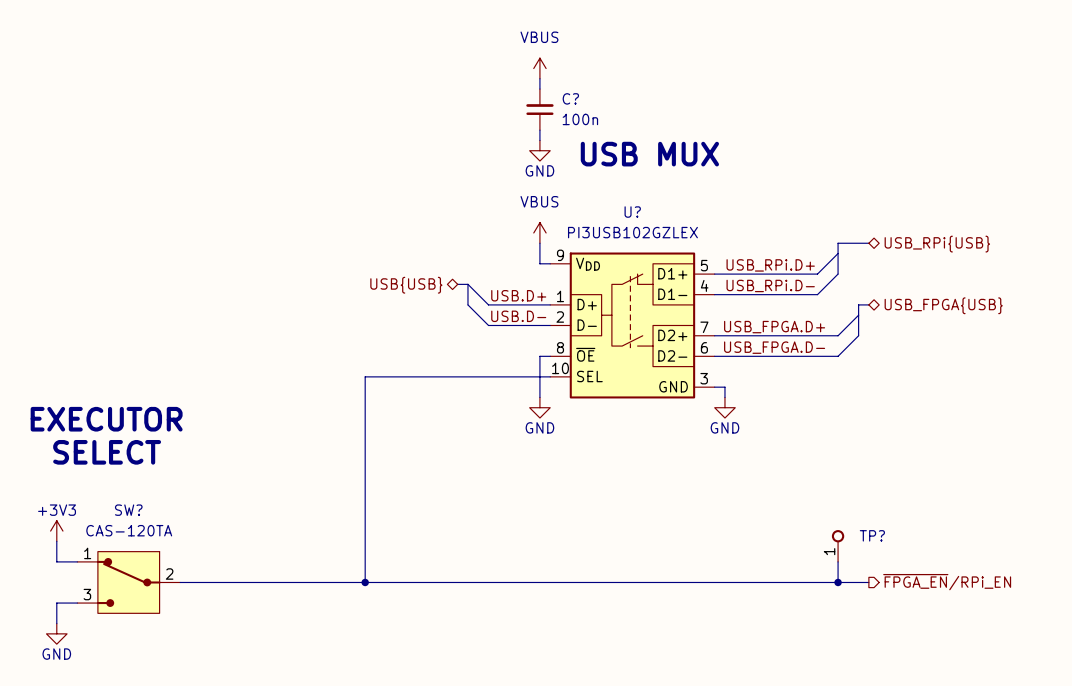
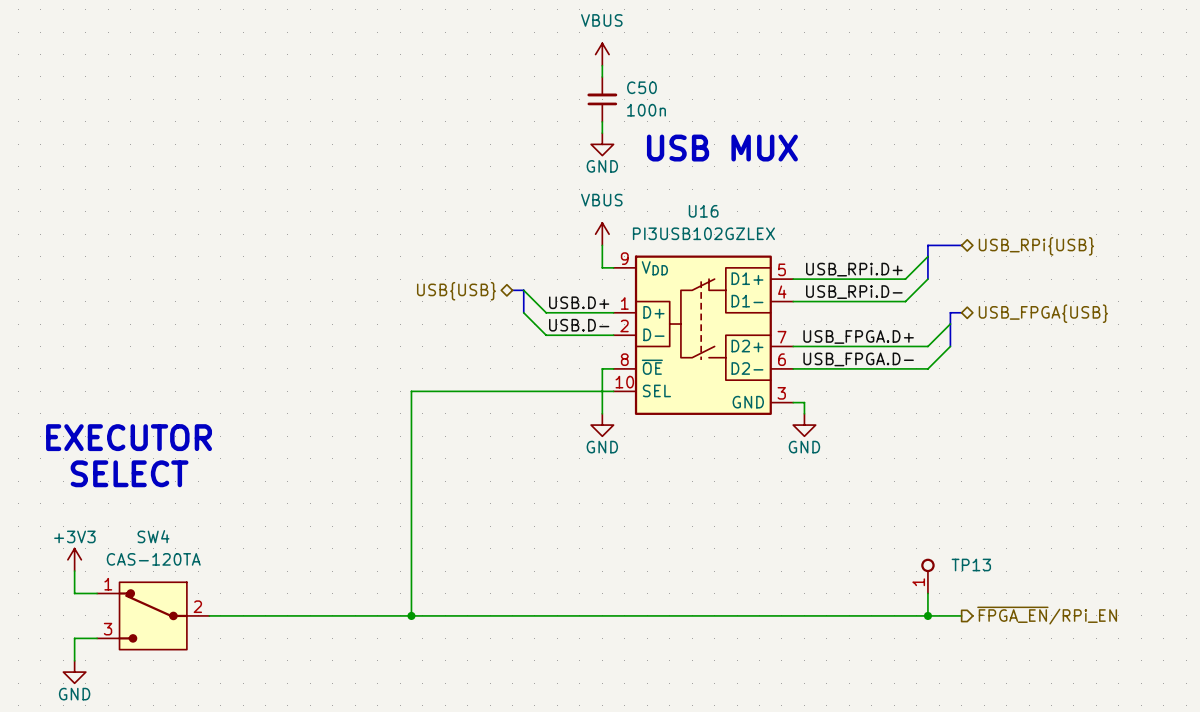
C? name: C? (570, 98) -> C50 (641, 87)
U? name: U? (632, 212) -> U16 (703, 211)
SW? name: SW? (128, 510) -> SW4 (153, 536)
TP? name: TP? (872, 535) -> TP13 (971, 565)

